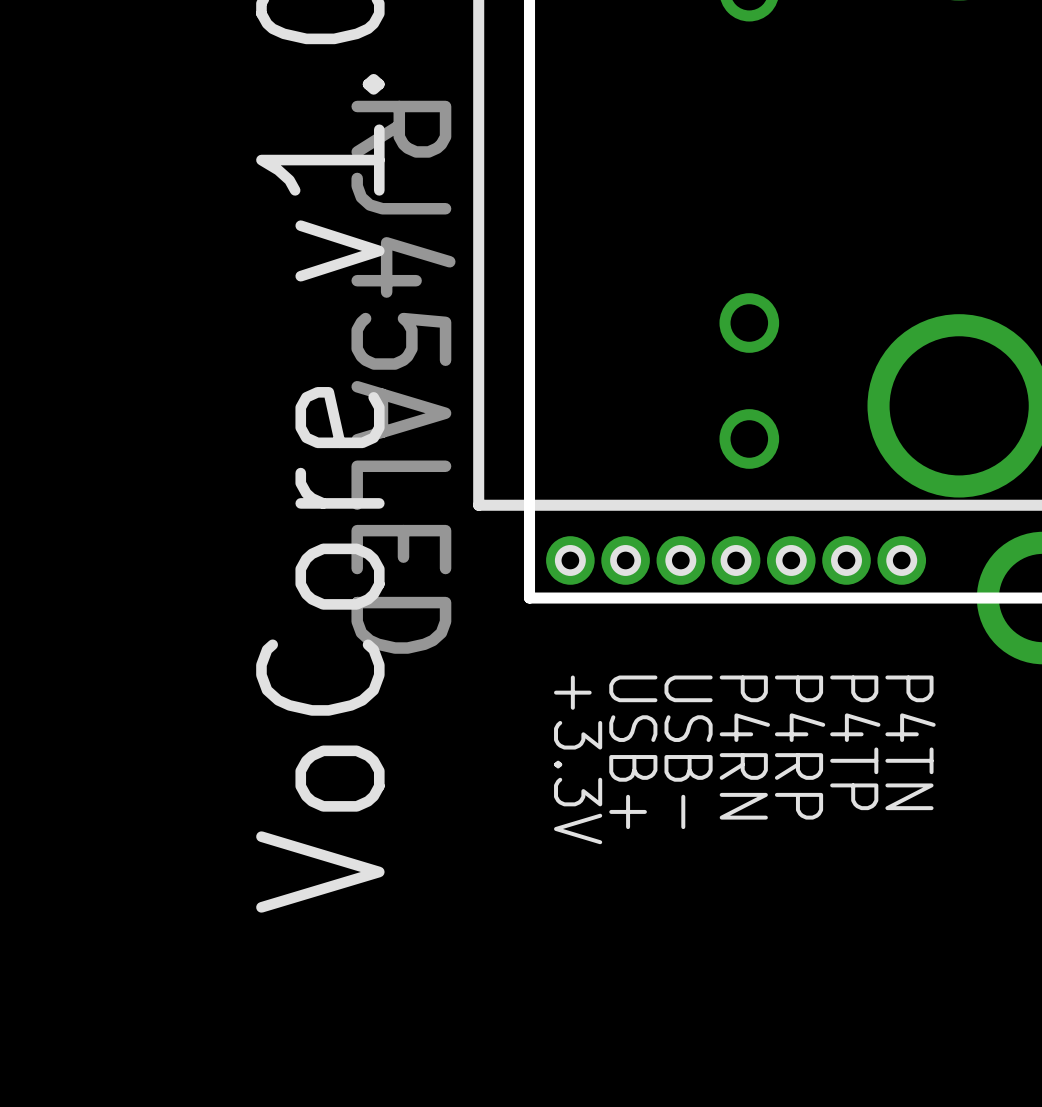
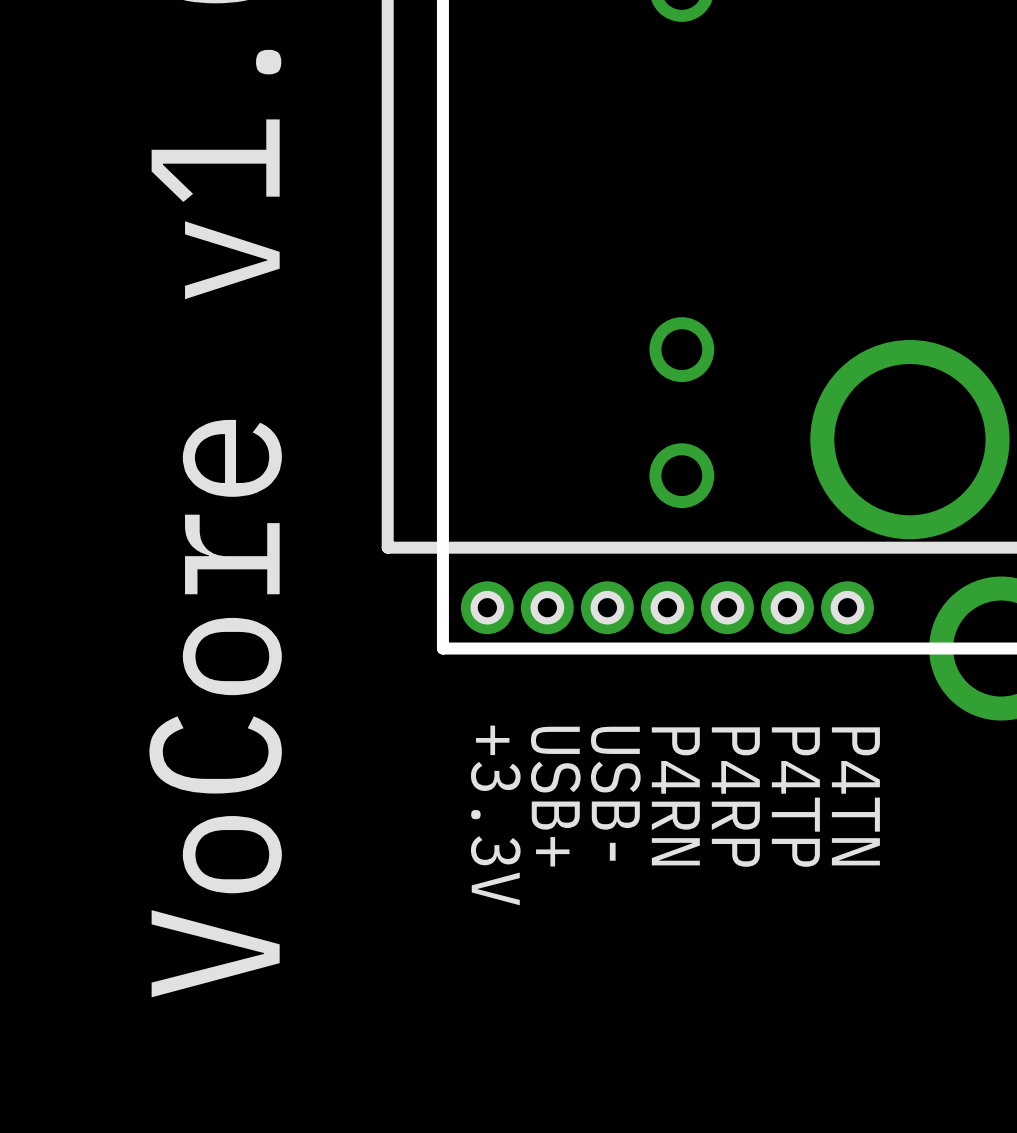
part value: RJ45ALED (403, 377) -> none

